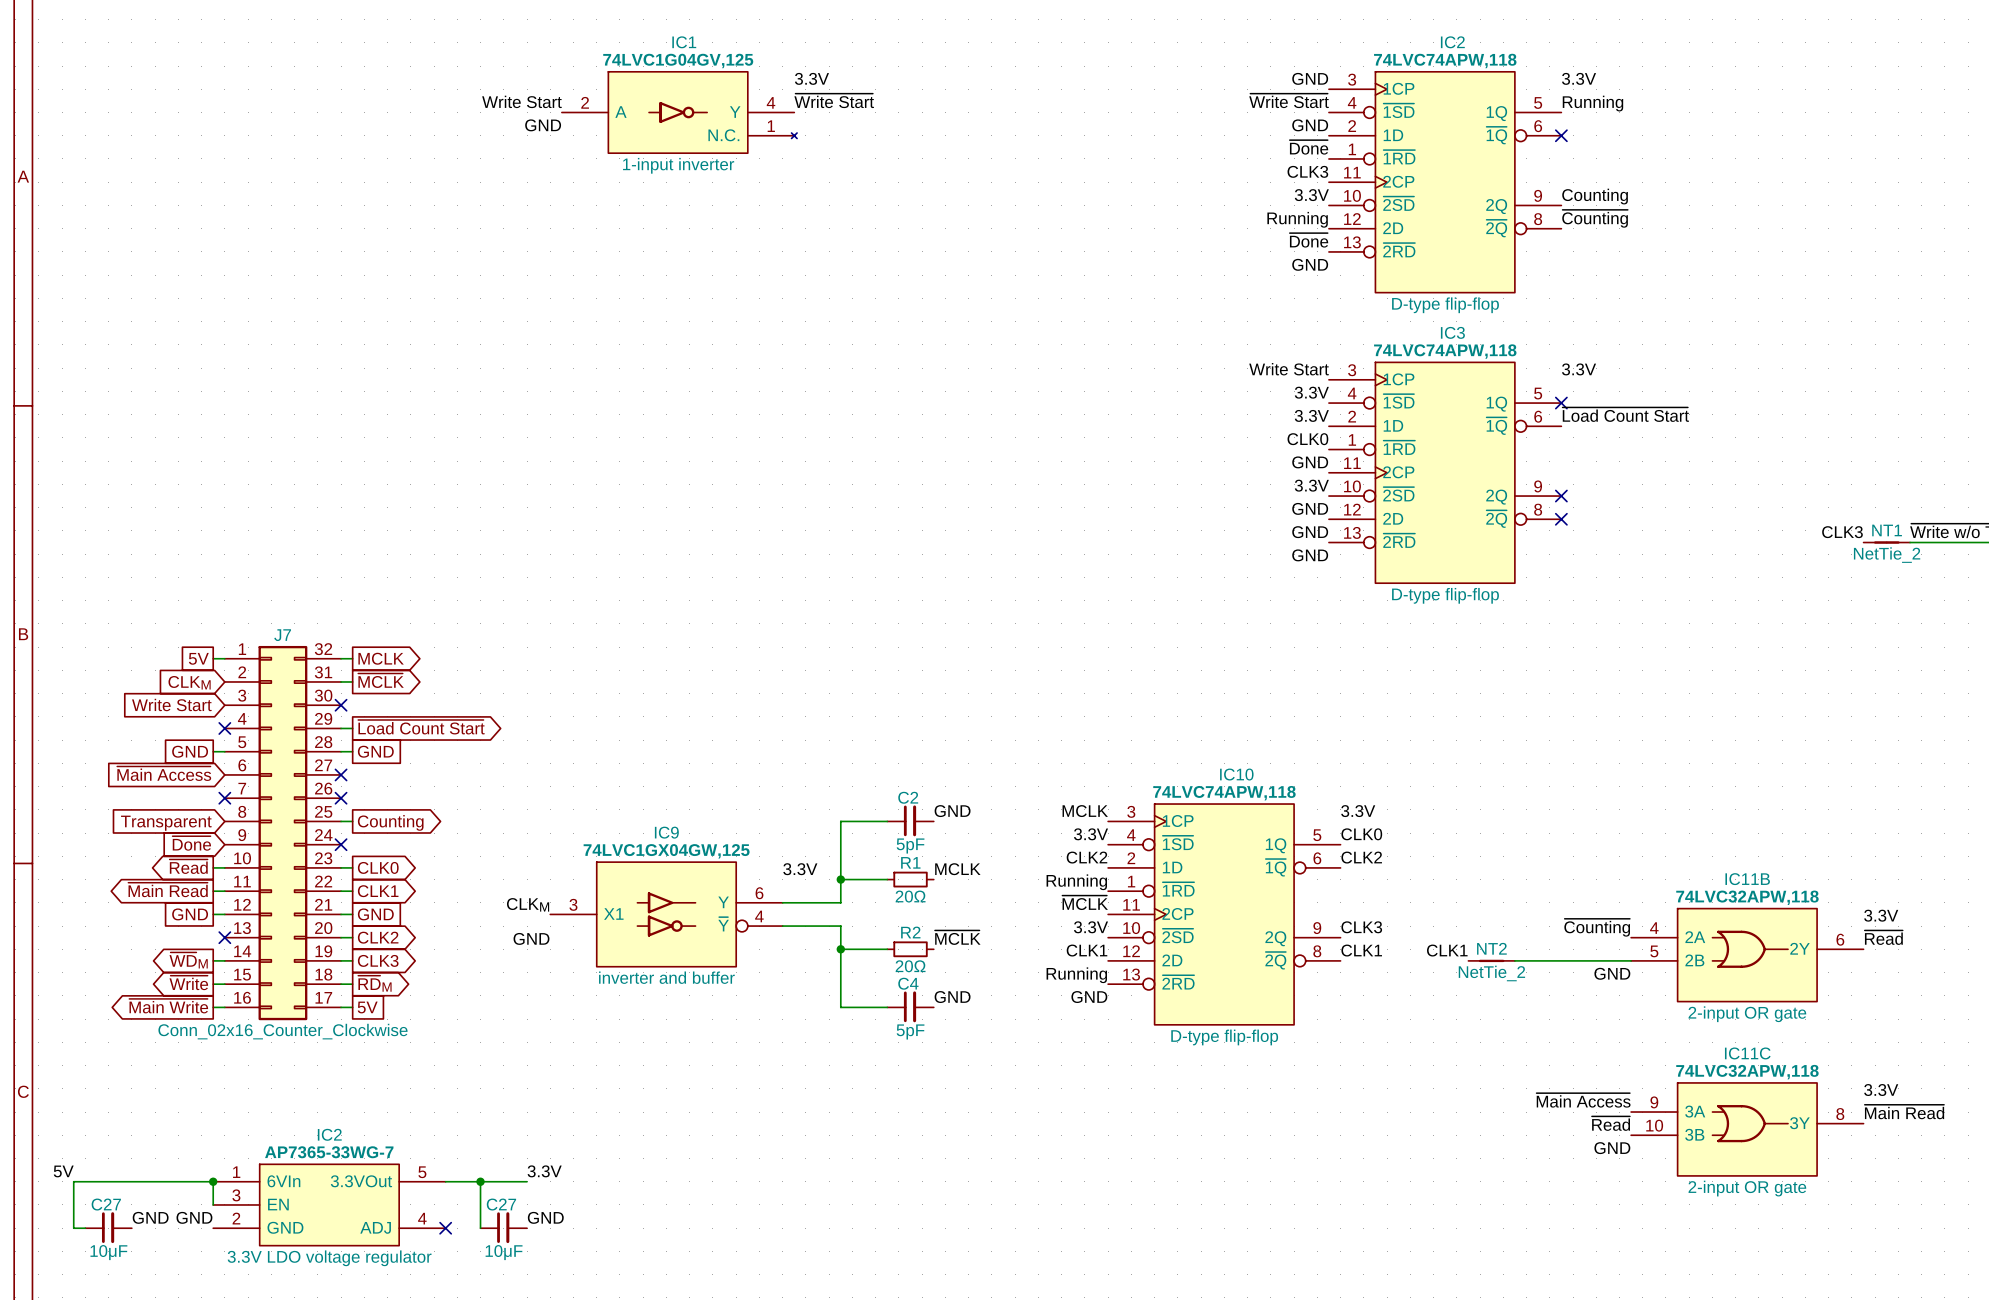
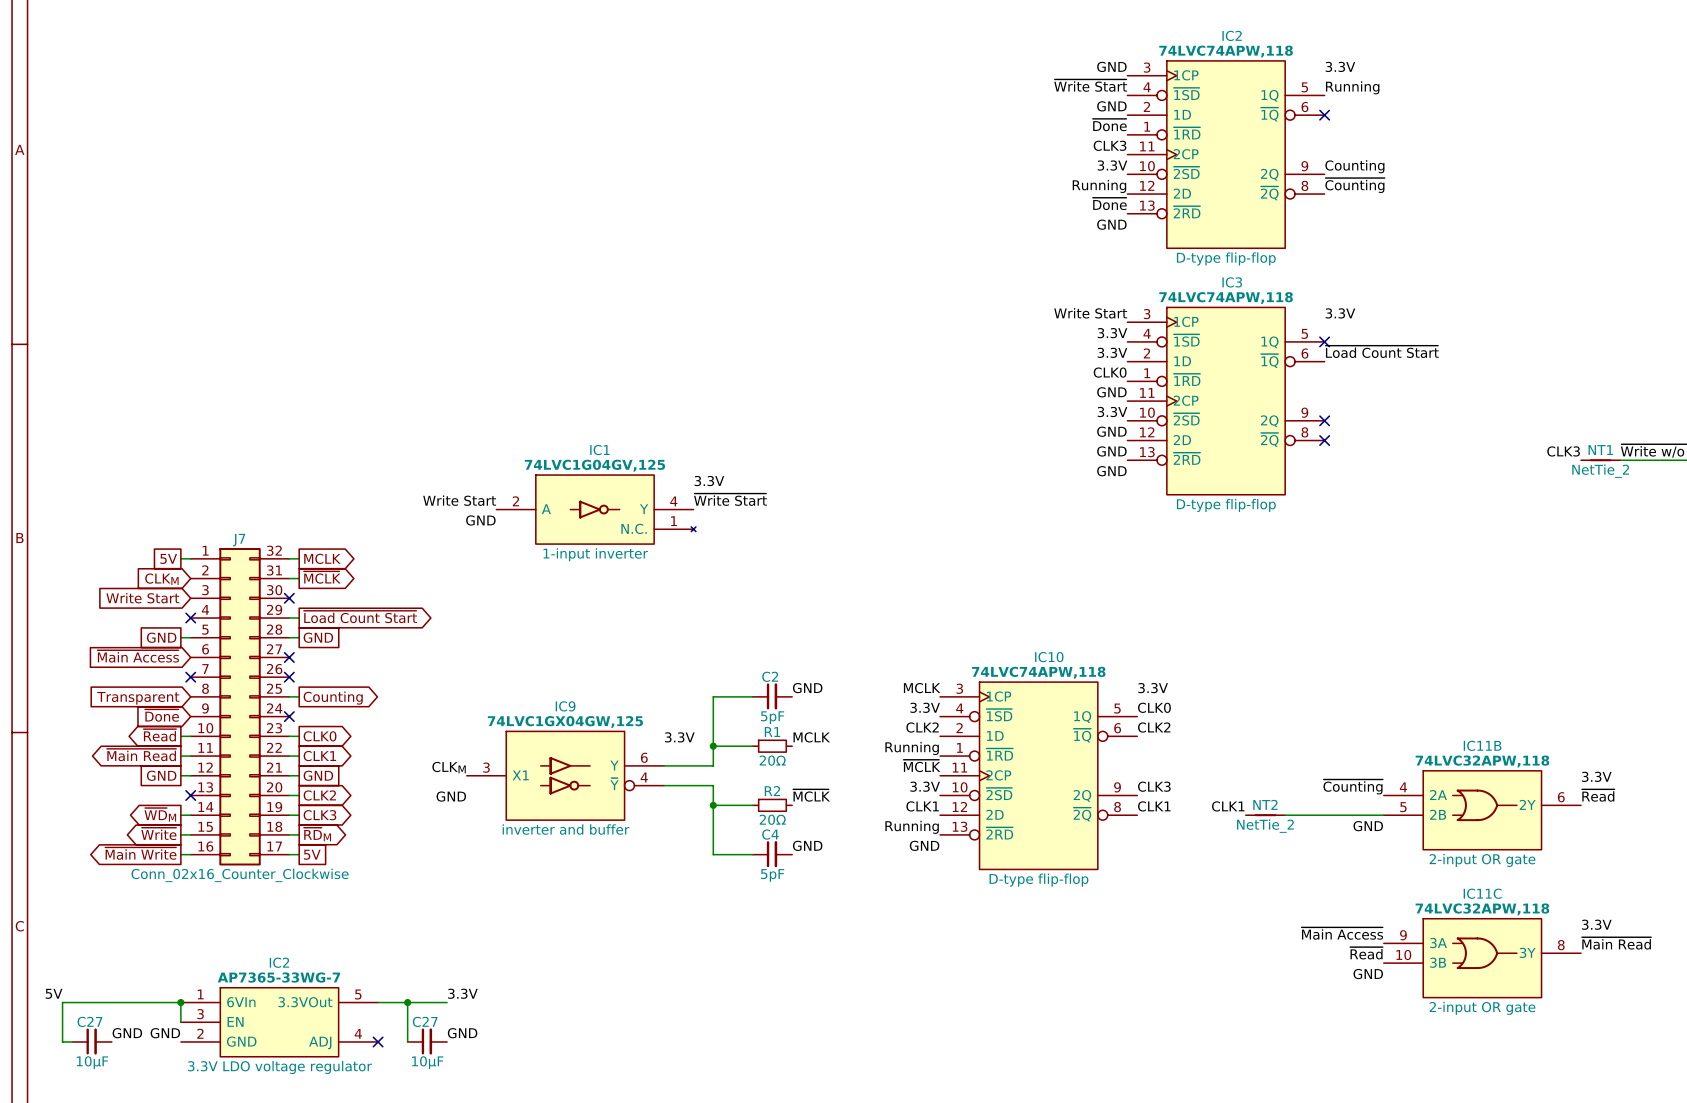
label: 3.3V (811, 78) -> none
label: ~{Write Start} (834, 100) -> none
label: Write Start (521, 101) -> none
IC1 position: (679, 112) -> (596, 509)
label: GND (543, 125) -> none
label: none -> 3.3V (709, 481)
label: none -> ~{Write Start} (730, 499)
label: none -> Write Start (459, 500)
label: none -> GND (480, 520)

